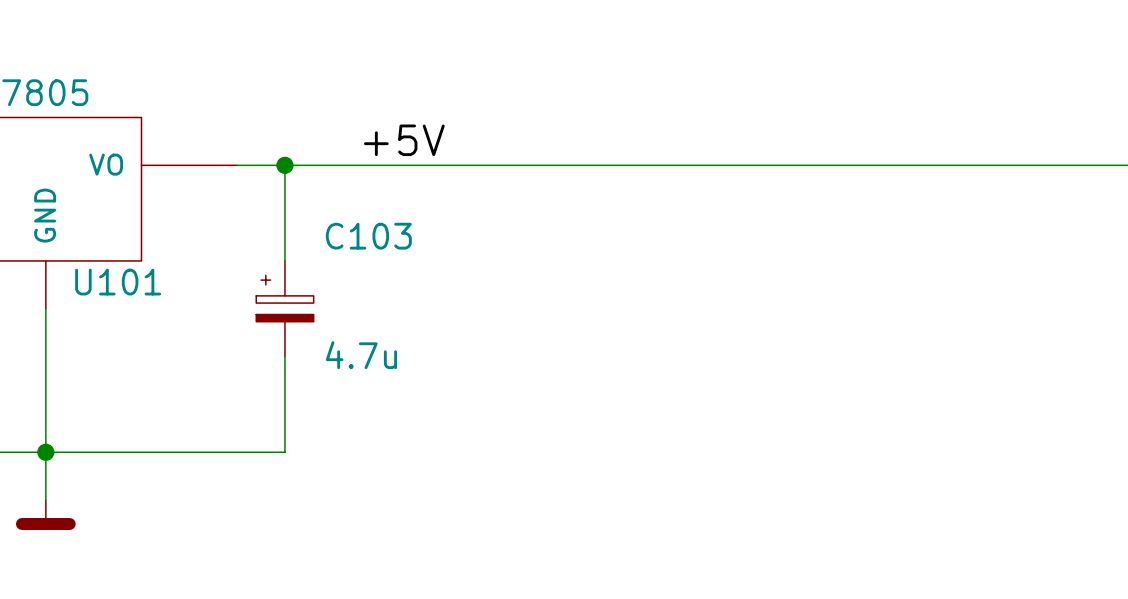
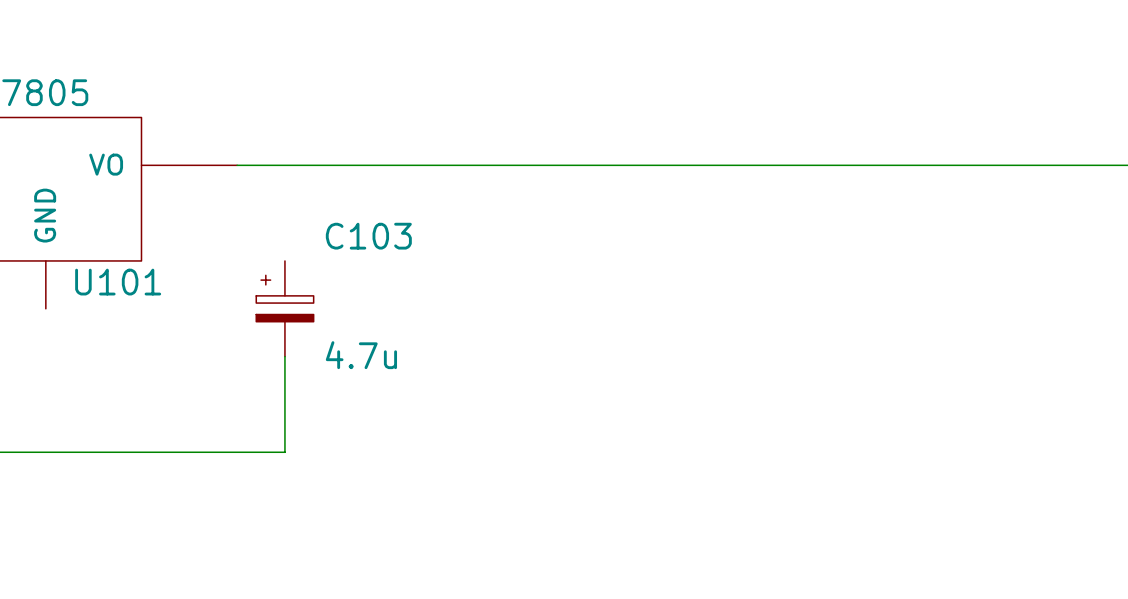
label: +5V (404, 140) -> none
wire: (284, 165) (284, 260) -> none
junction: (284, 165) -> none
wire: (45, 308) (45, 500) -> none
junction: (45, 452) -> none
power symbol: (45, 515) -> none

